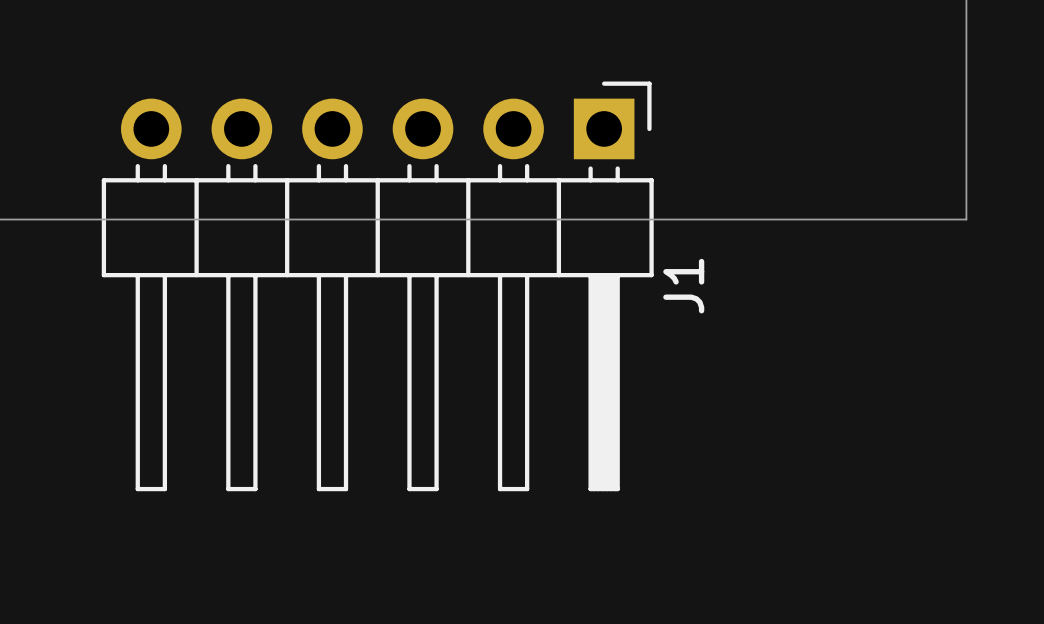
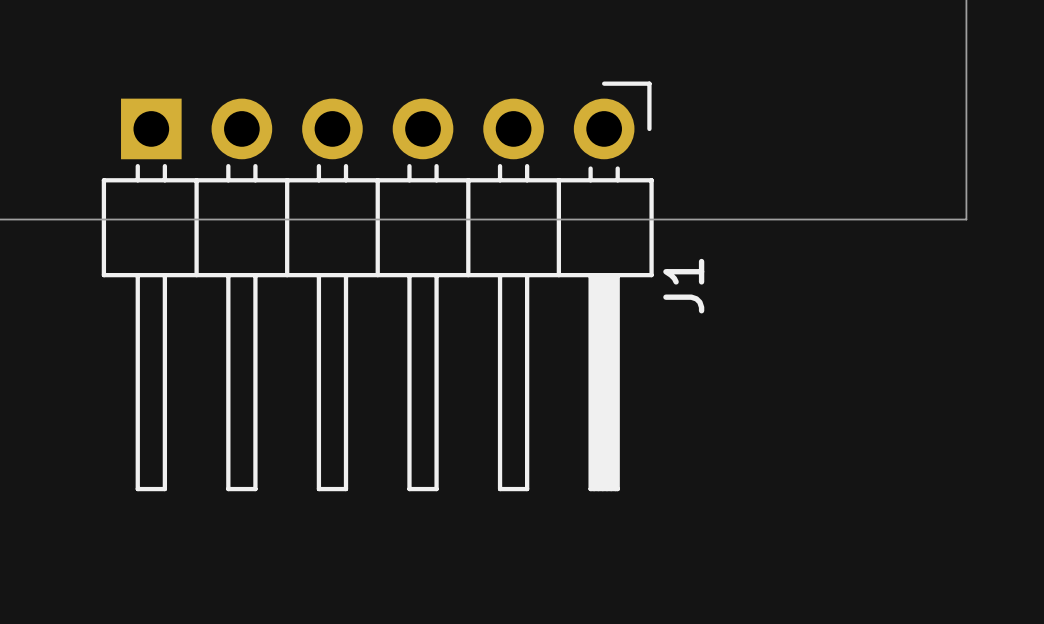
J1 footprint: [101, 81, 654, 492] -> [101, 81, 654, 492]

